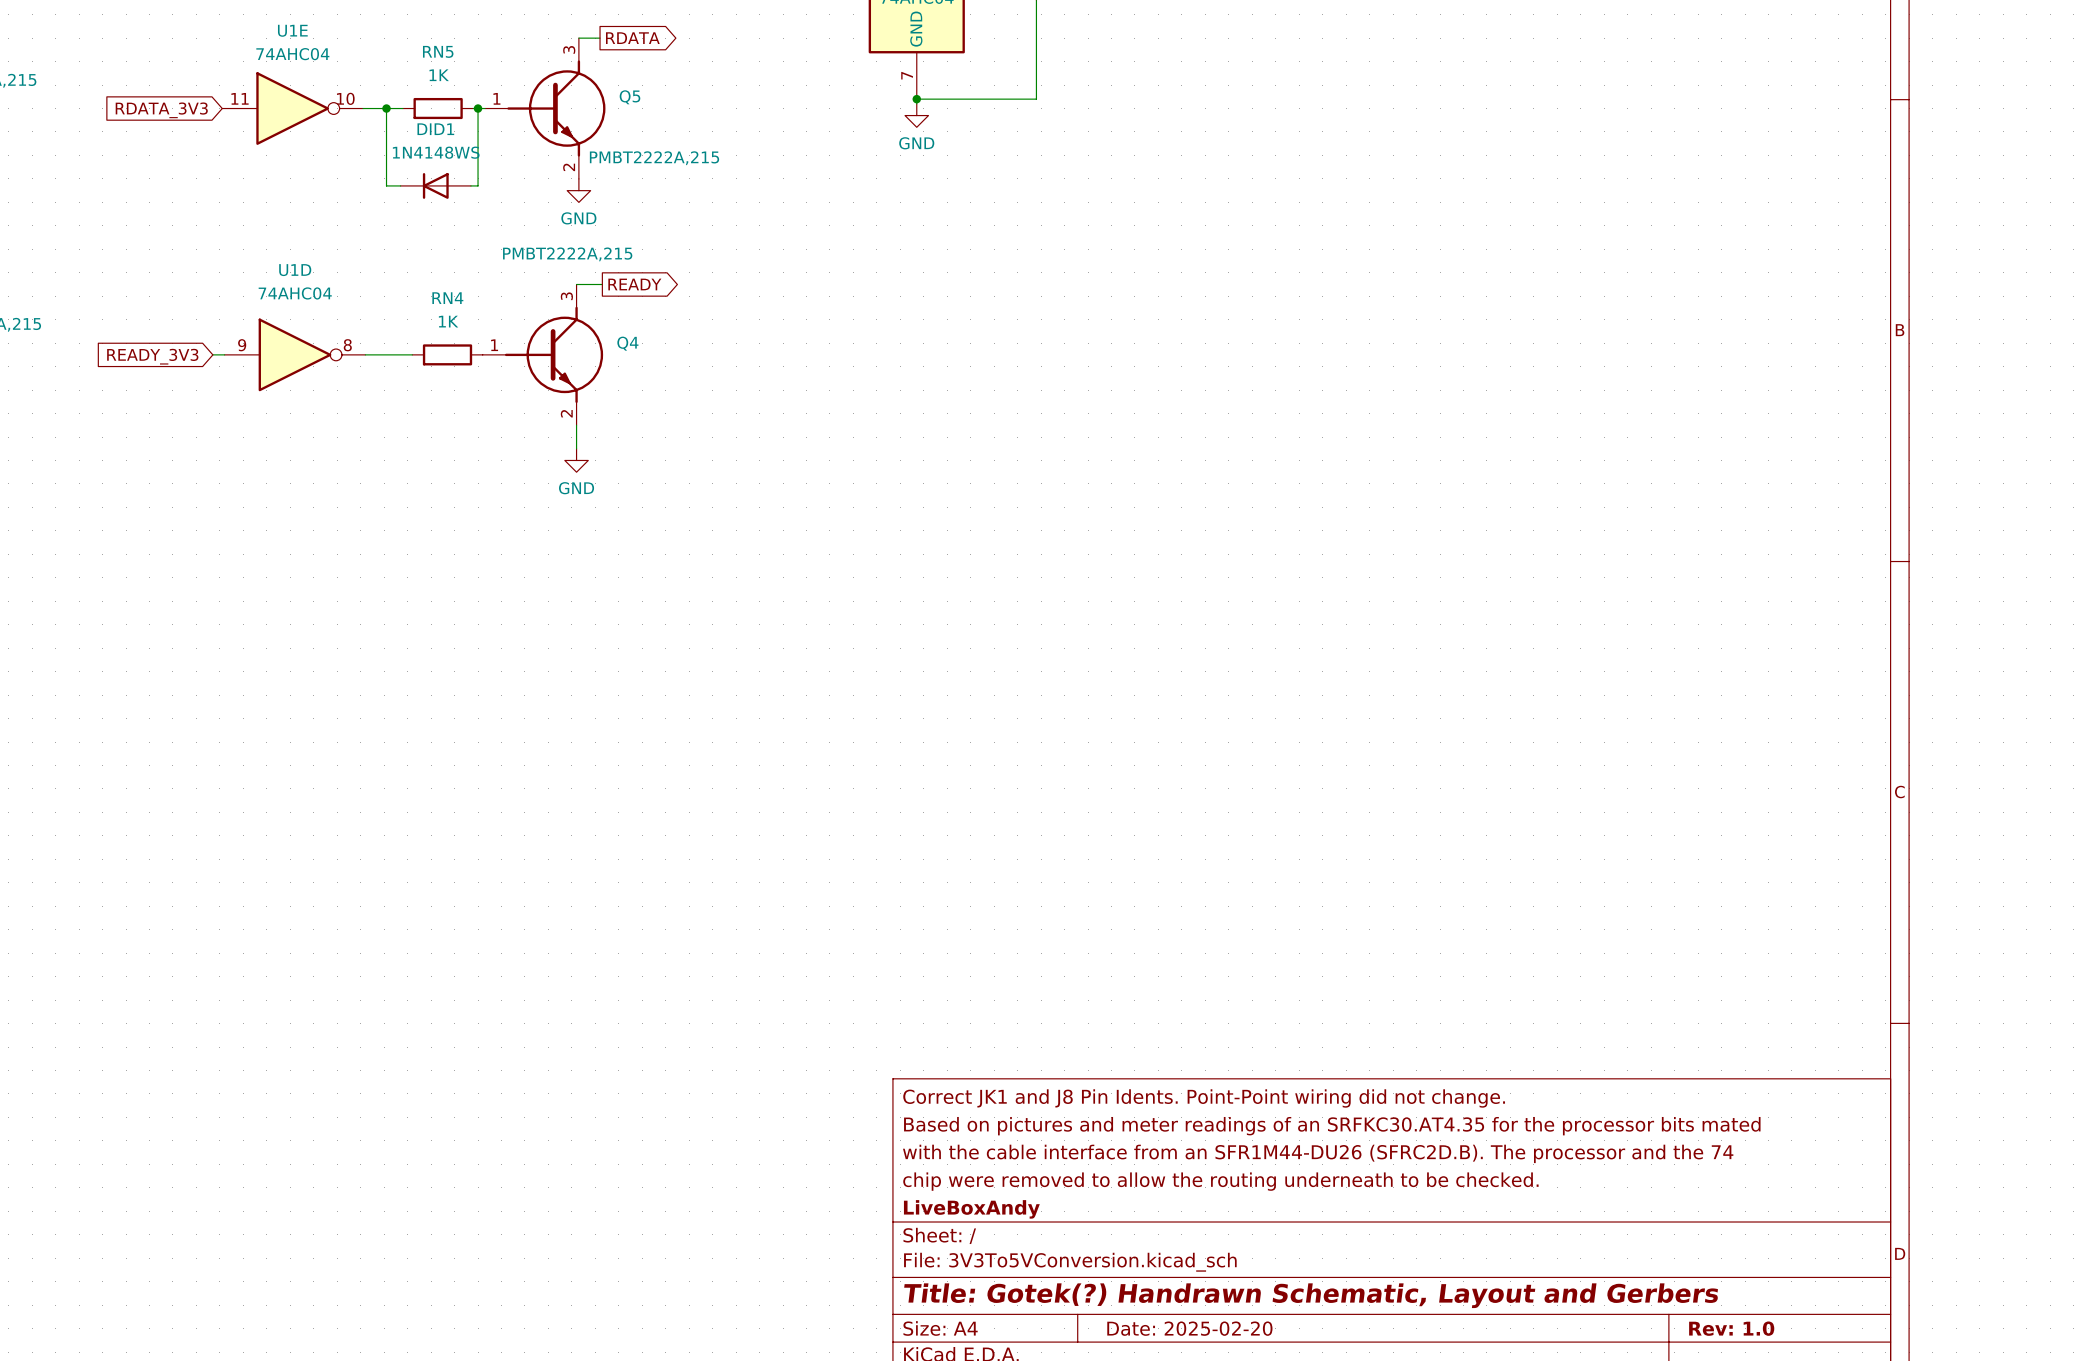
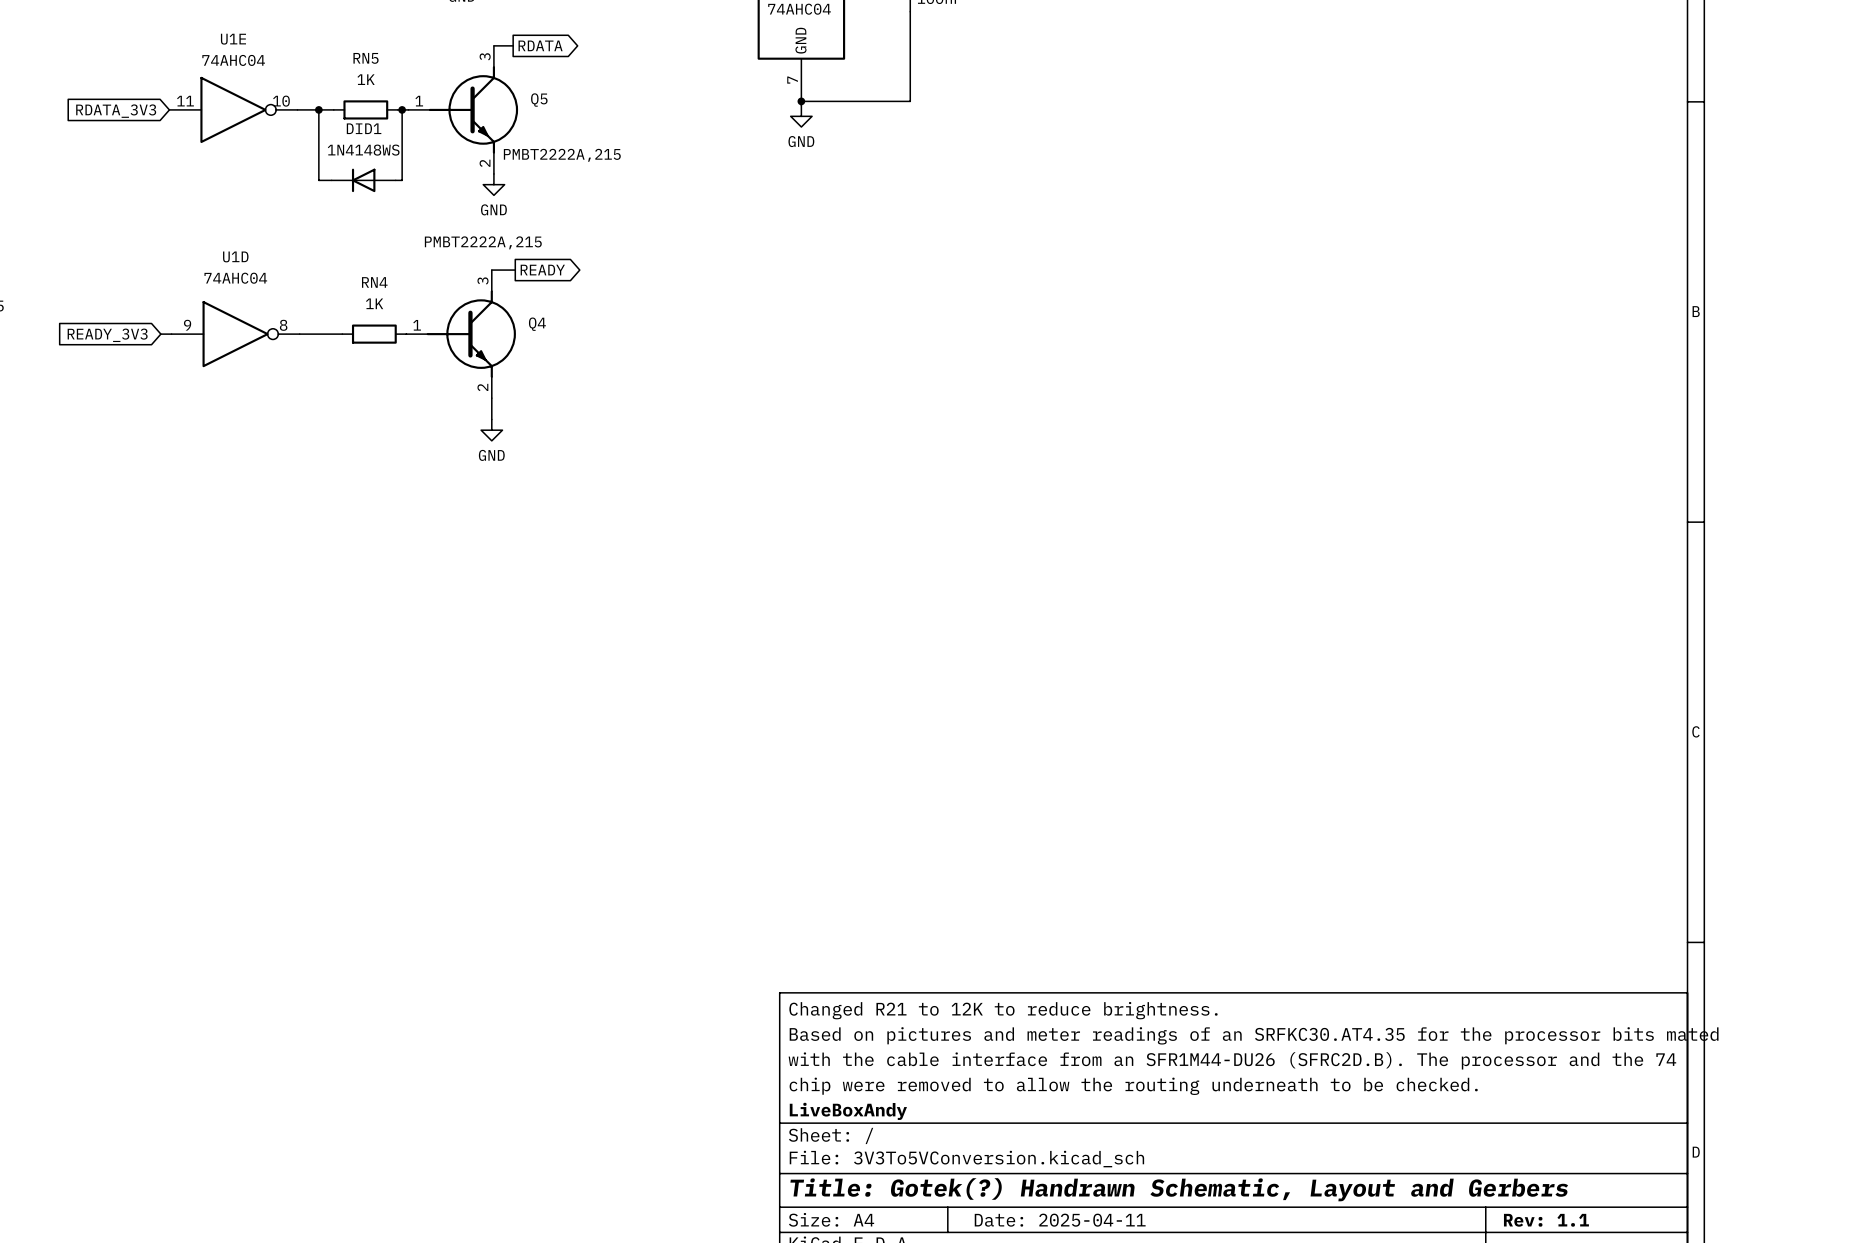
title block: Correct JK1 and J8 Pin Idents. Point-Point wiring did not change. (1204, 1098) -> Changed R21 to 12K to reduce brightness. (1003, 1010)
title block: Date: 2025-02-20 (1189, 1328) -> Date: 2025-04-11 (1060, 1220)
title block: Rev: 1.0 (1731, 1328) -> Rev: 1.1 (1546, 1220)

